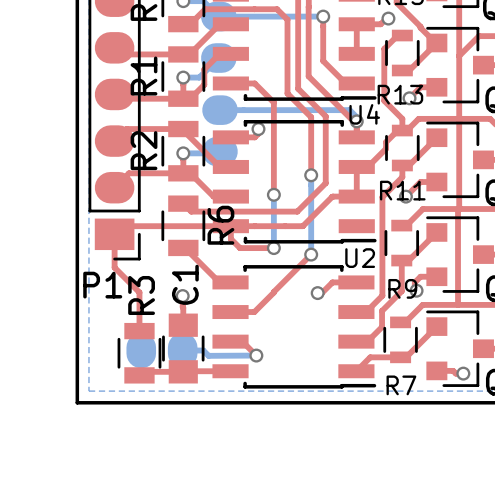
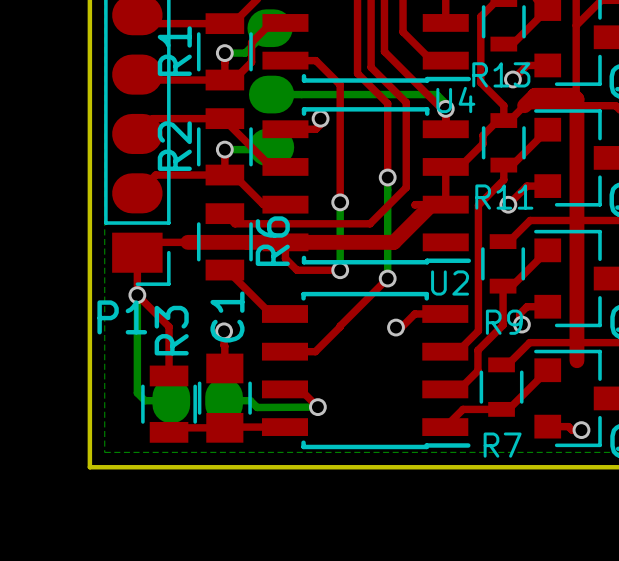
top track: none -> (524, 105) (534, 95) (573, 95) (576, 99) (576, 360)
top track: (332, 196) (302, 226) -> (431, 204) (393, 242) (377, 242)
top track width: thin (154, 226) (302, 226) -> thick (187, 242) (377, 242)
bottom track: none -> (137, 295) (137, 393) (145, 400) (171, 400)
via: none -> (137, 295)

